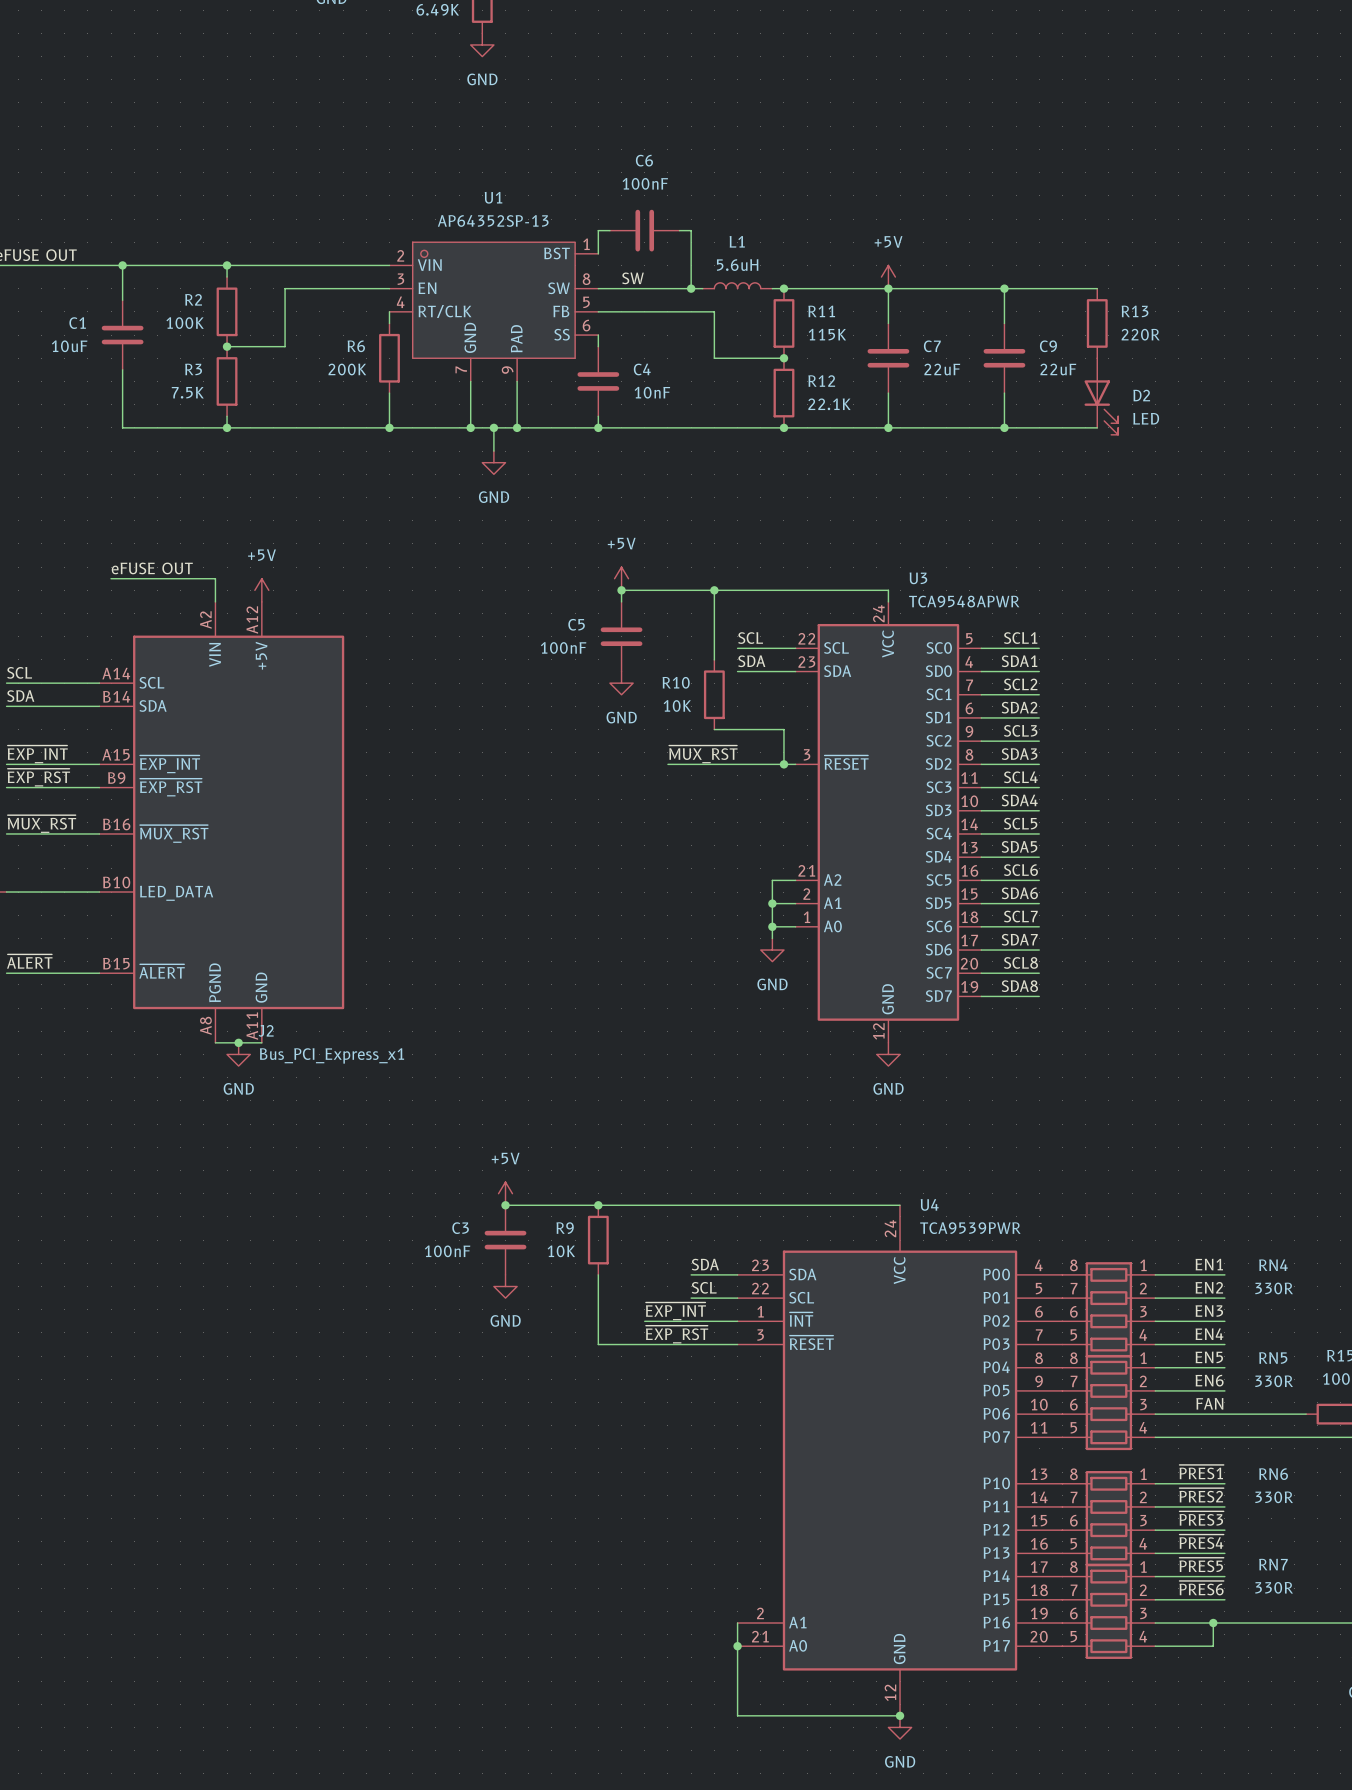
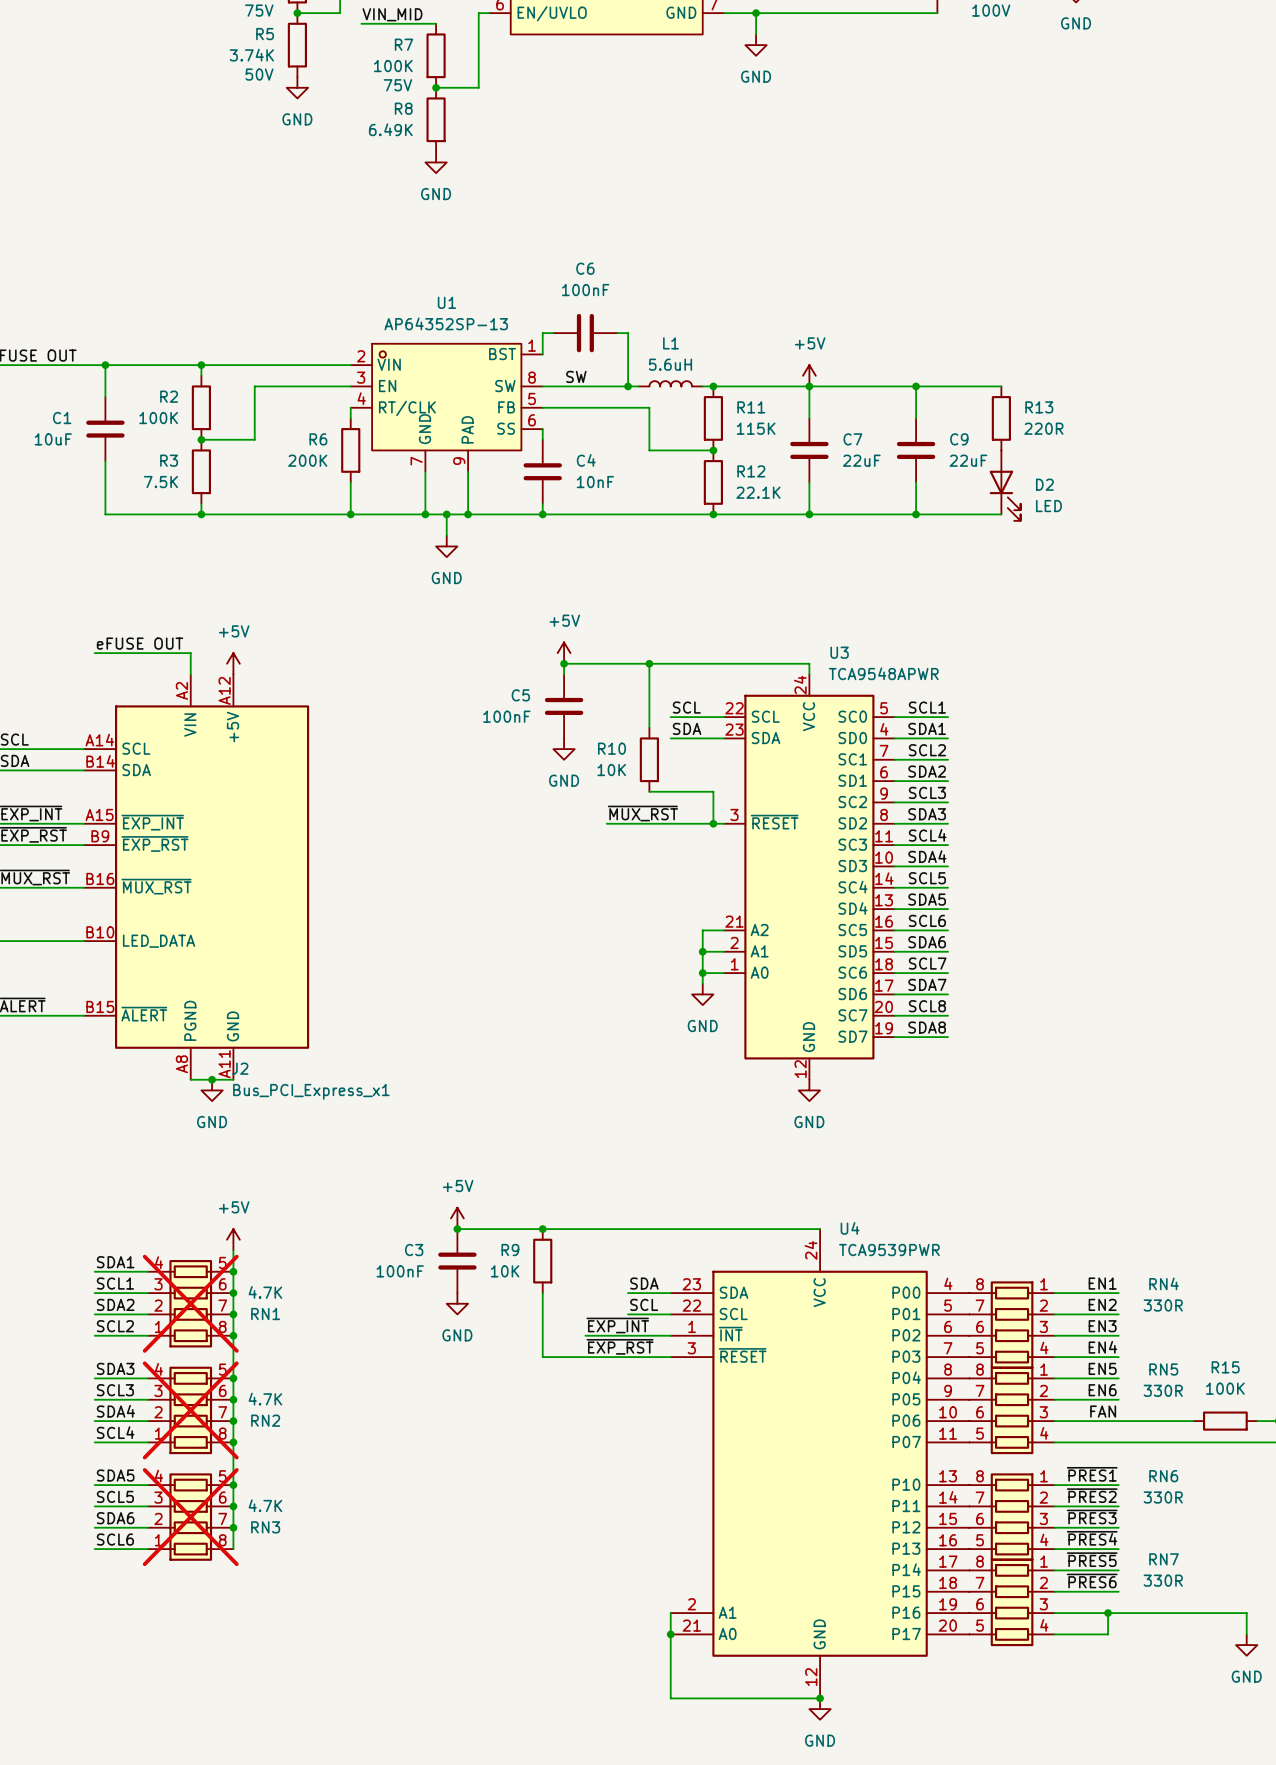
power symbol: none -> +5V (233, 1239)
wire: none -> (233, 1250) (233, 1549)
label: none -> SDA1 (115, 1262)
wire: none -> (94, 1271) (148, 1271)
junction: none -> (233, 1271)
label: none -> SCL1 (115, 1283)
wire: none -> (94, 1293) (148, 1293)
junction: none -> (233, 1293)
RN1: none -> 4.7K (190, 1303)
label: none -> SDA2 (115, 1304)
wire: none -> (94, 1314) (148, 1314)
junction: none -> (233, 1314)
label: none -> SCL2 (115, 1326)
wire: none -> (94, 1335) (148, 1335)
junction: none -> (233, 1335)
label: none -> SDA3 (115, 1368)
wire: none -> (94, 1378) (148, 1378)
junction: none -> (233, 1378)
label: none -> SCL3 (115, 1390)
wire: none -> (94, 1399) (148, 1399)
junction: none -> (233, 1399)
RN2: none -> 4.7K (190, 1410)
label: none -> SDA4 (115, 1411)
wire: none -> (94, 1421) (148, 1421)
junction: none -> (233, 1421)
label: none -> SCL4 (115, 1432)
wire: none -> (94, 1442) (148, 1442)
junction: none -> (233, 1442)
label: none -> SDA5 (115, 1475)
wire: none -> (94, 1485) (148, 1485)
junction: none -> (233, 1485)
label: none -> SCL5 (115, 1496)
wire: none -> (94, 1506) (148, 1506)
junction: none -> (233, 1506)
RN3: none -> 4.7K (190, 1517)
label: none -> SDA6 (115, 1518)
wire: none -> (94, 1527) (148, 1527)
junction: none -> (233, 1527)
label: none -> SCL6 (115, 1539)
wire: none -> (94, 1549) (148, 1549)

